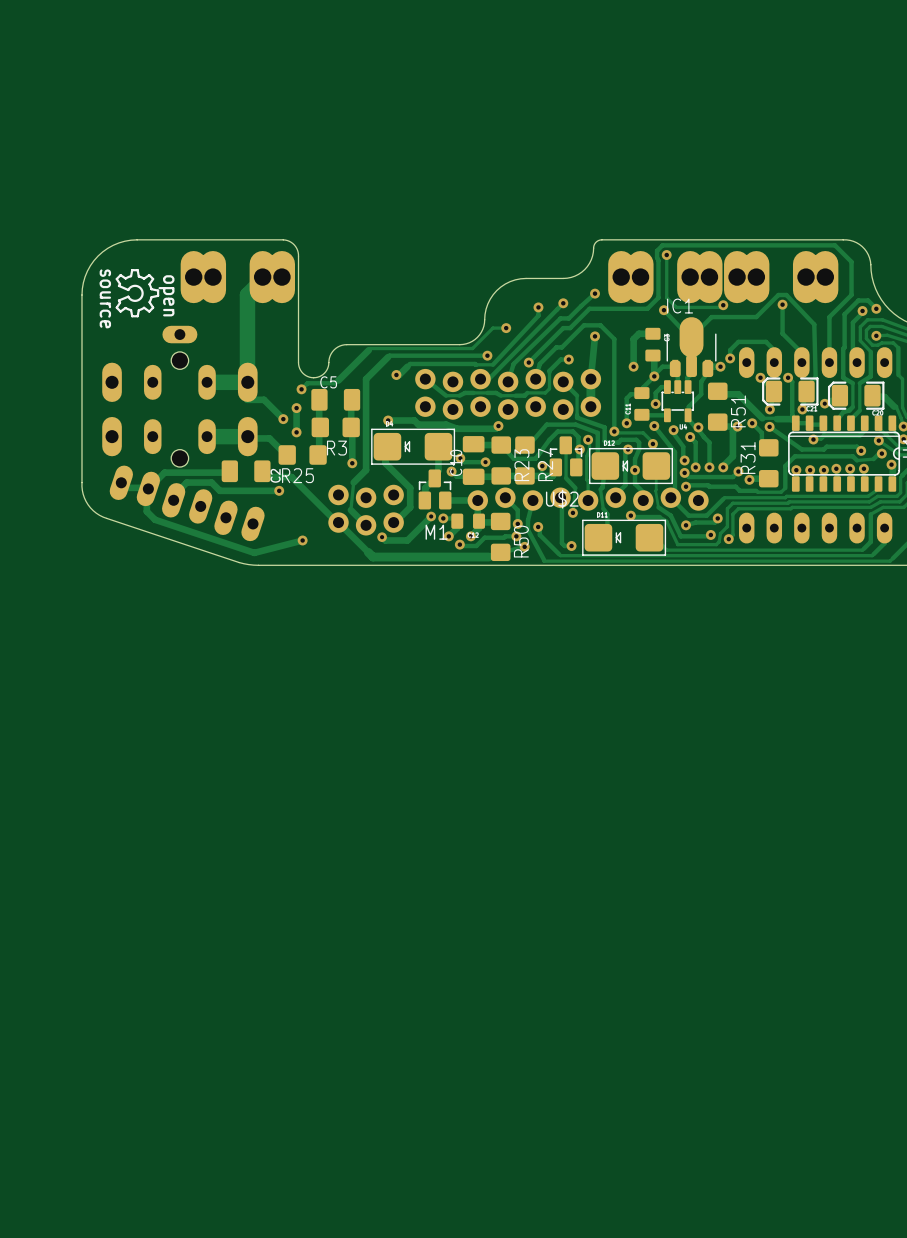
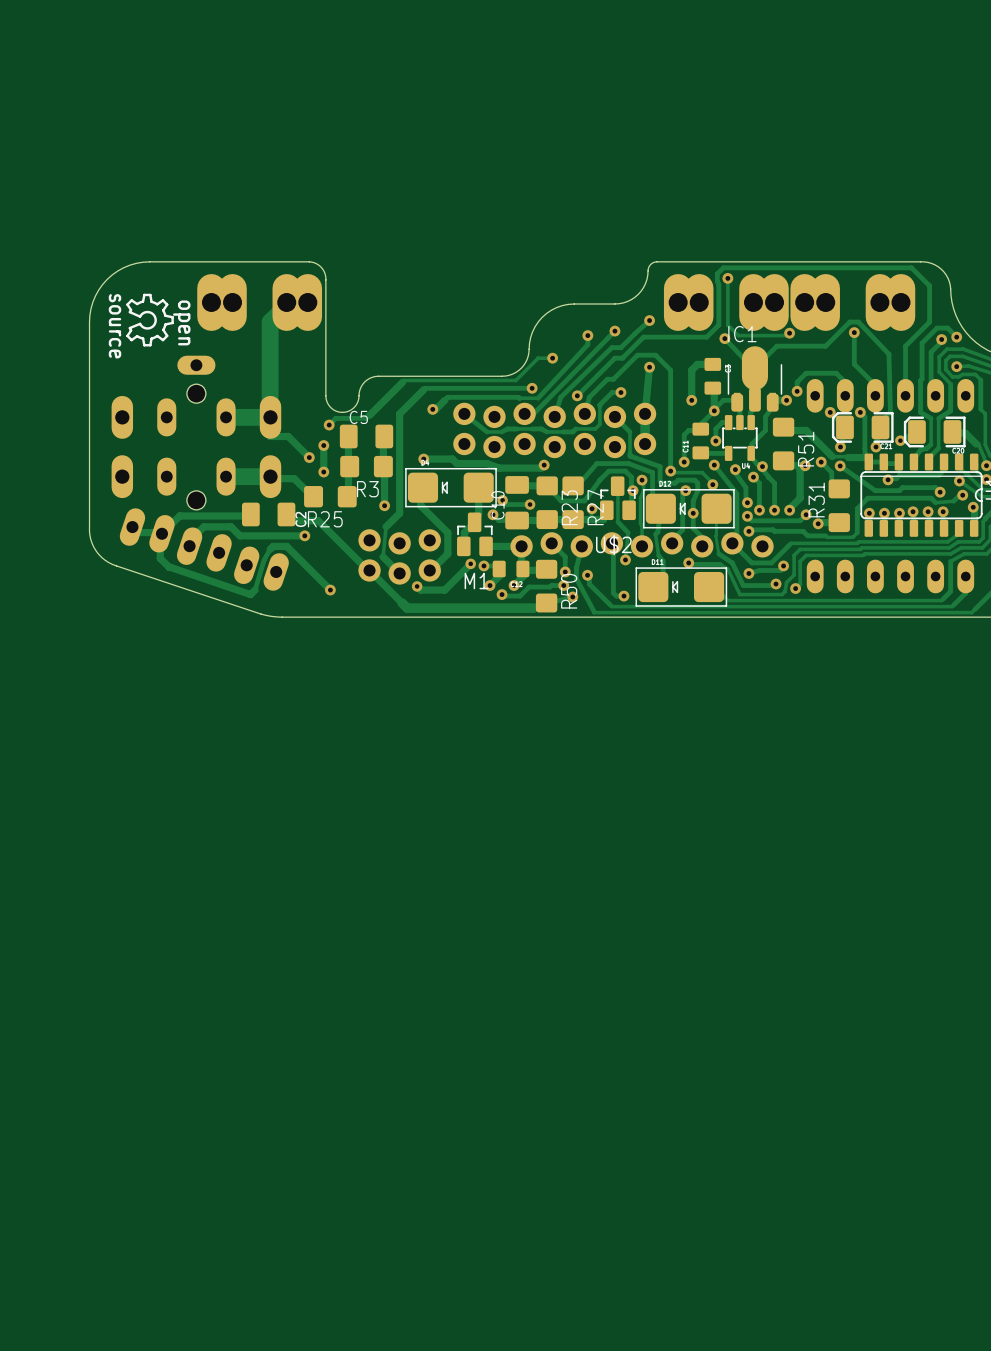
track: (155, 519) (254, 552) (302, 540) -> (169, 567) (250, 594) (255, 590) (264, 559) (270, 549) (273, 546) (286, 546) (330, 590)

